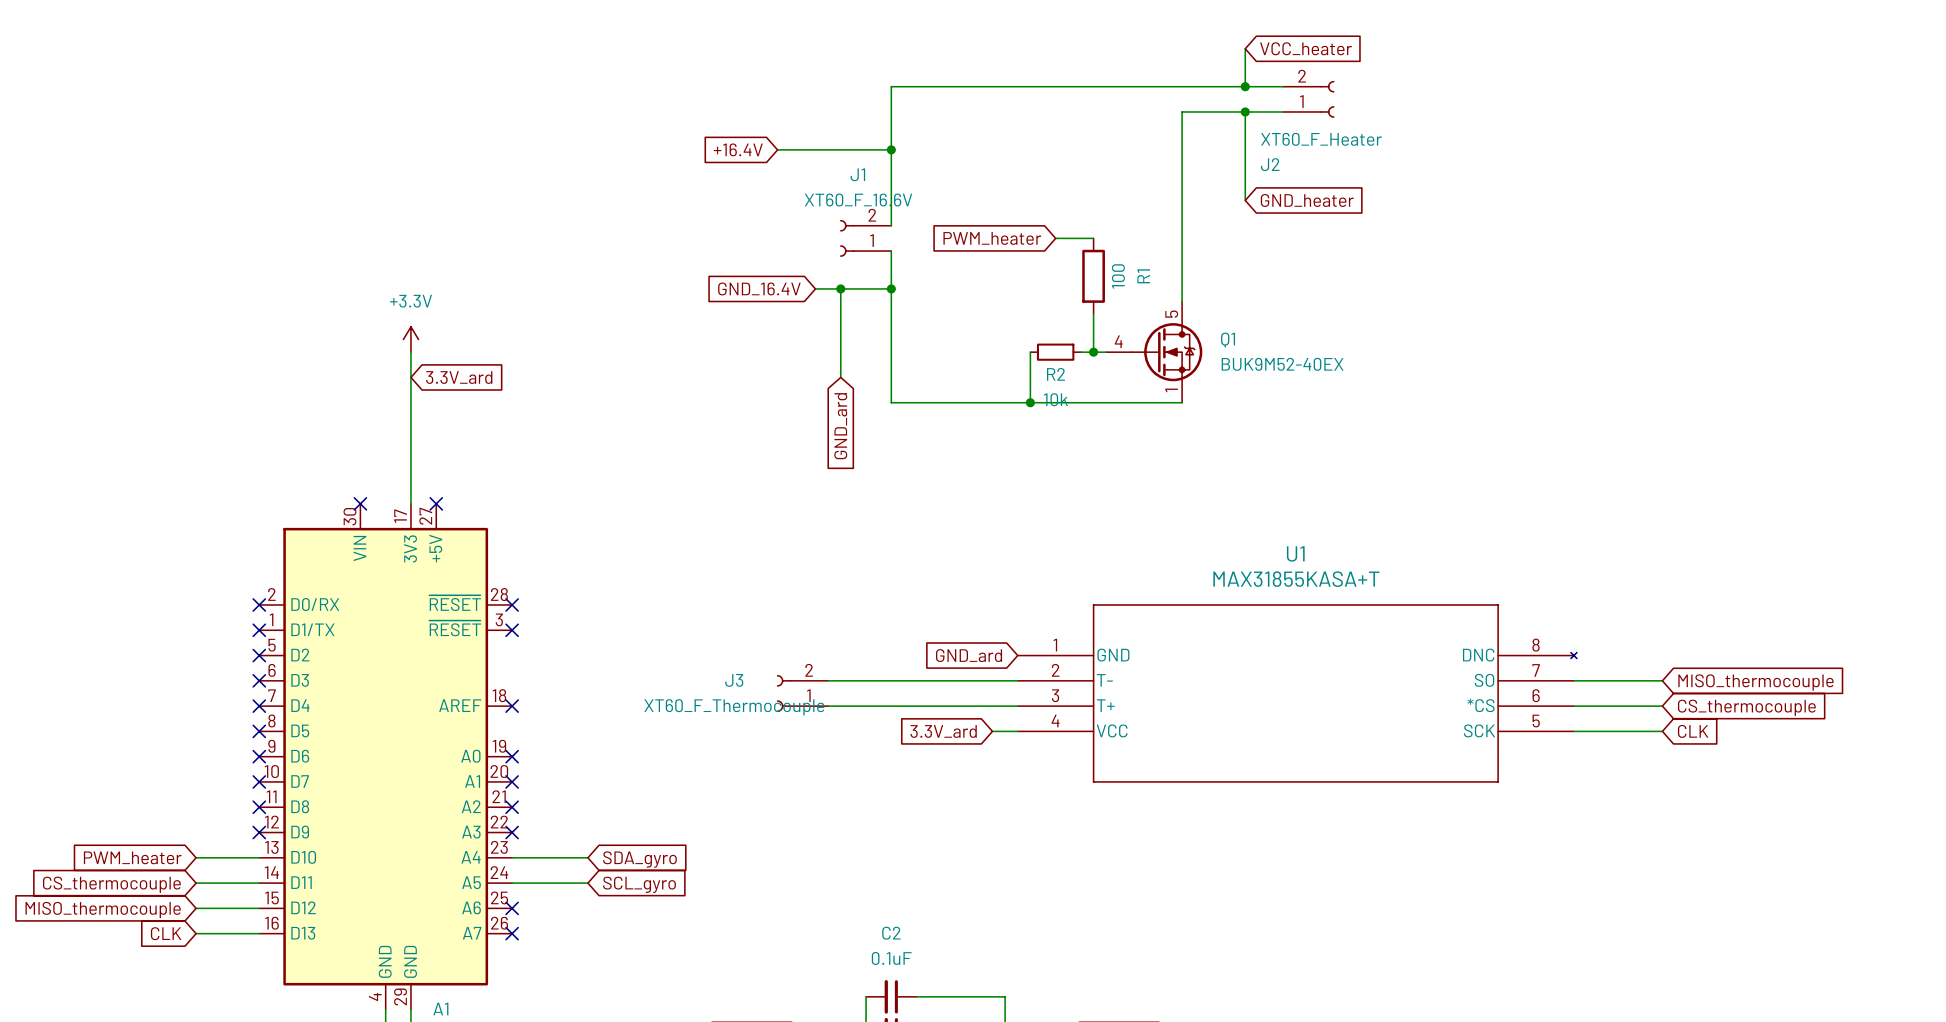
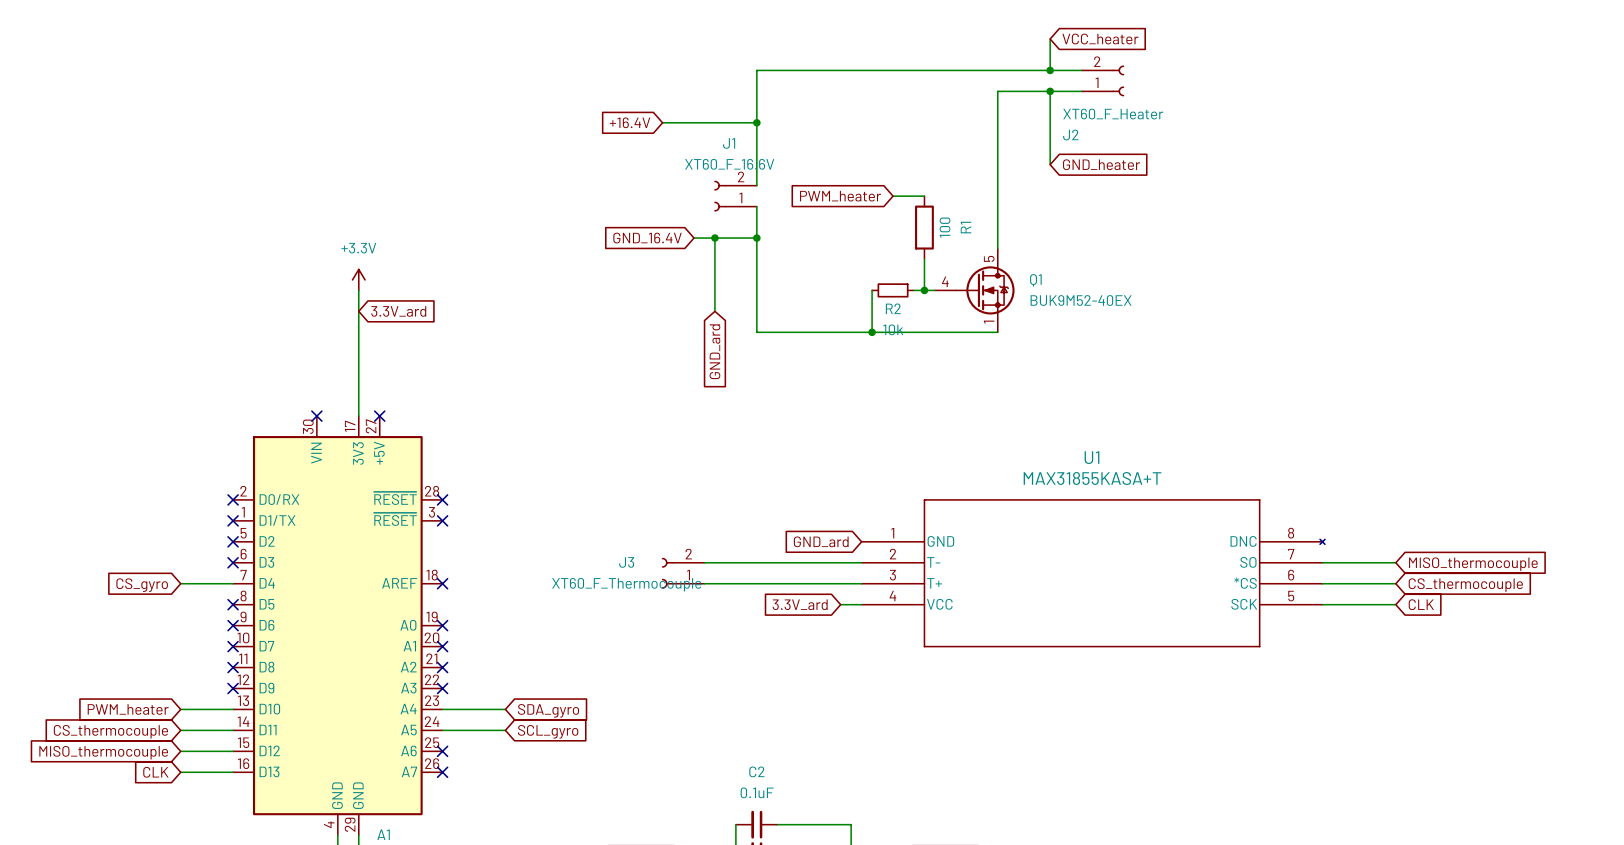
wire: none -> (180, 583) (233, 583)
no-connect mark: (259, 706) -> none
global label: none -> CS_gyro (142, 585)

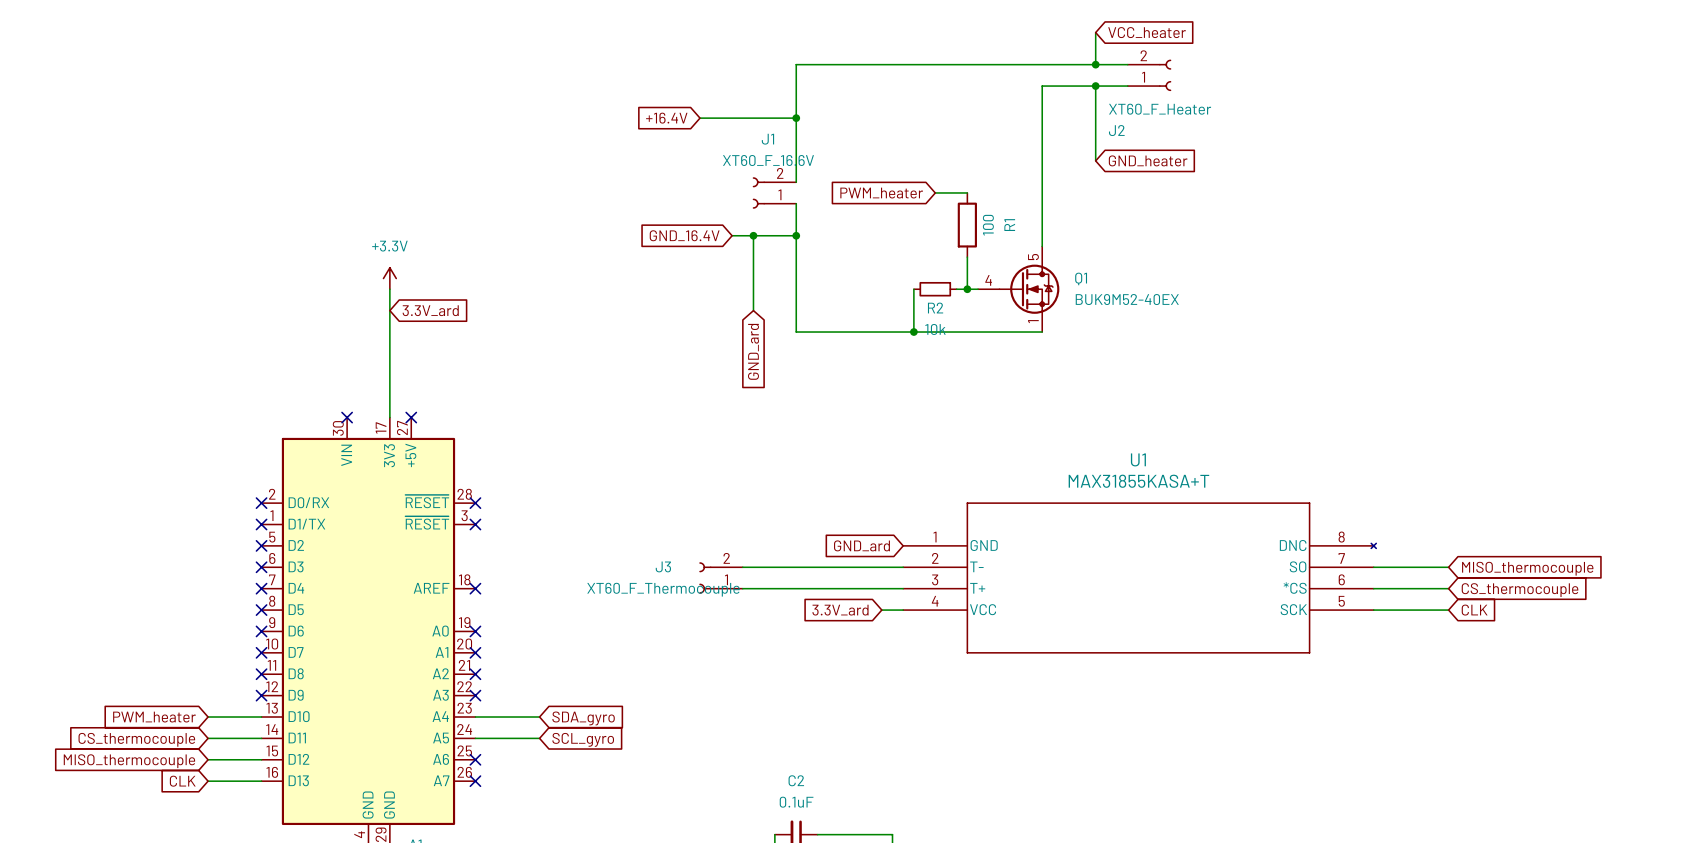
wire: (180, 583) (233, 583) -> none
no-connect mark: none -> (261, 588)
global label: CS_gyro (142, 585) -> none

